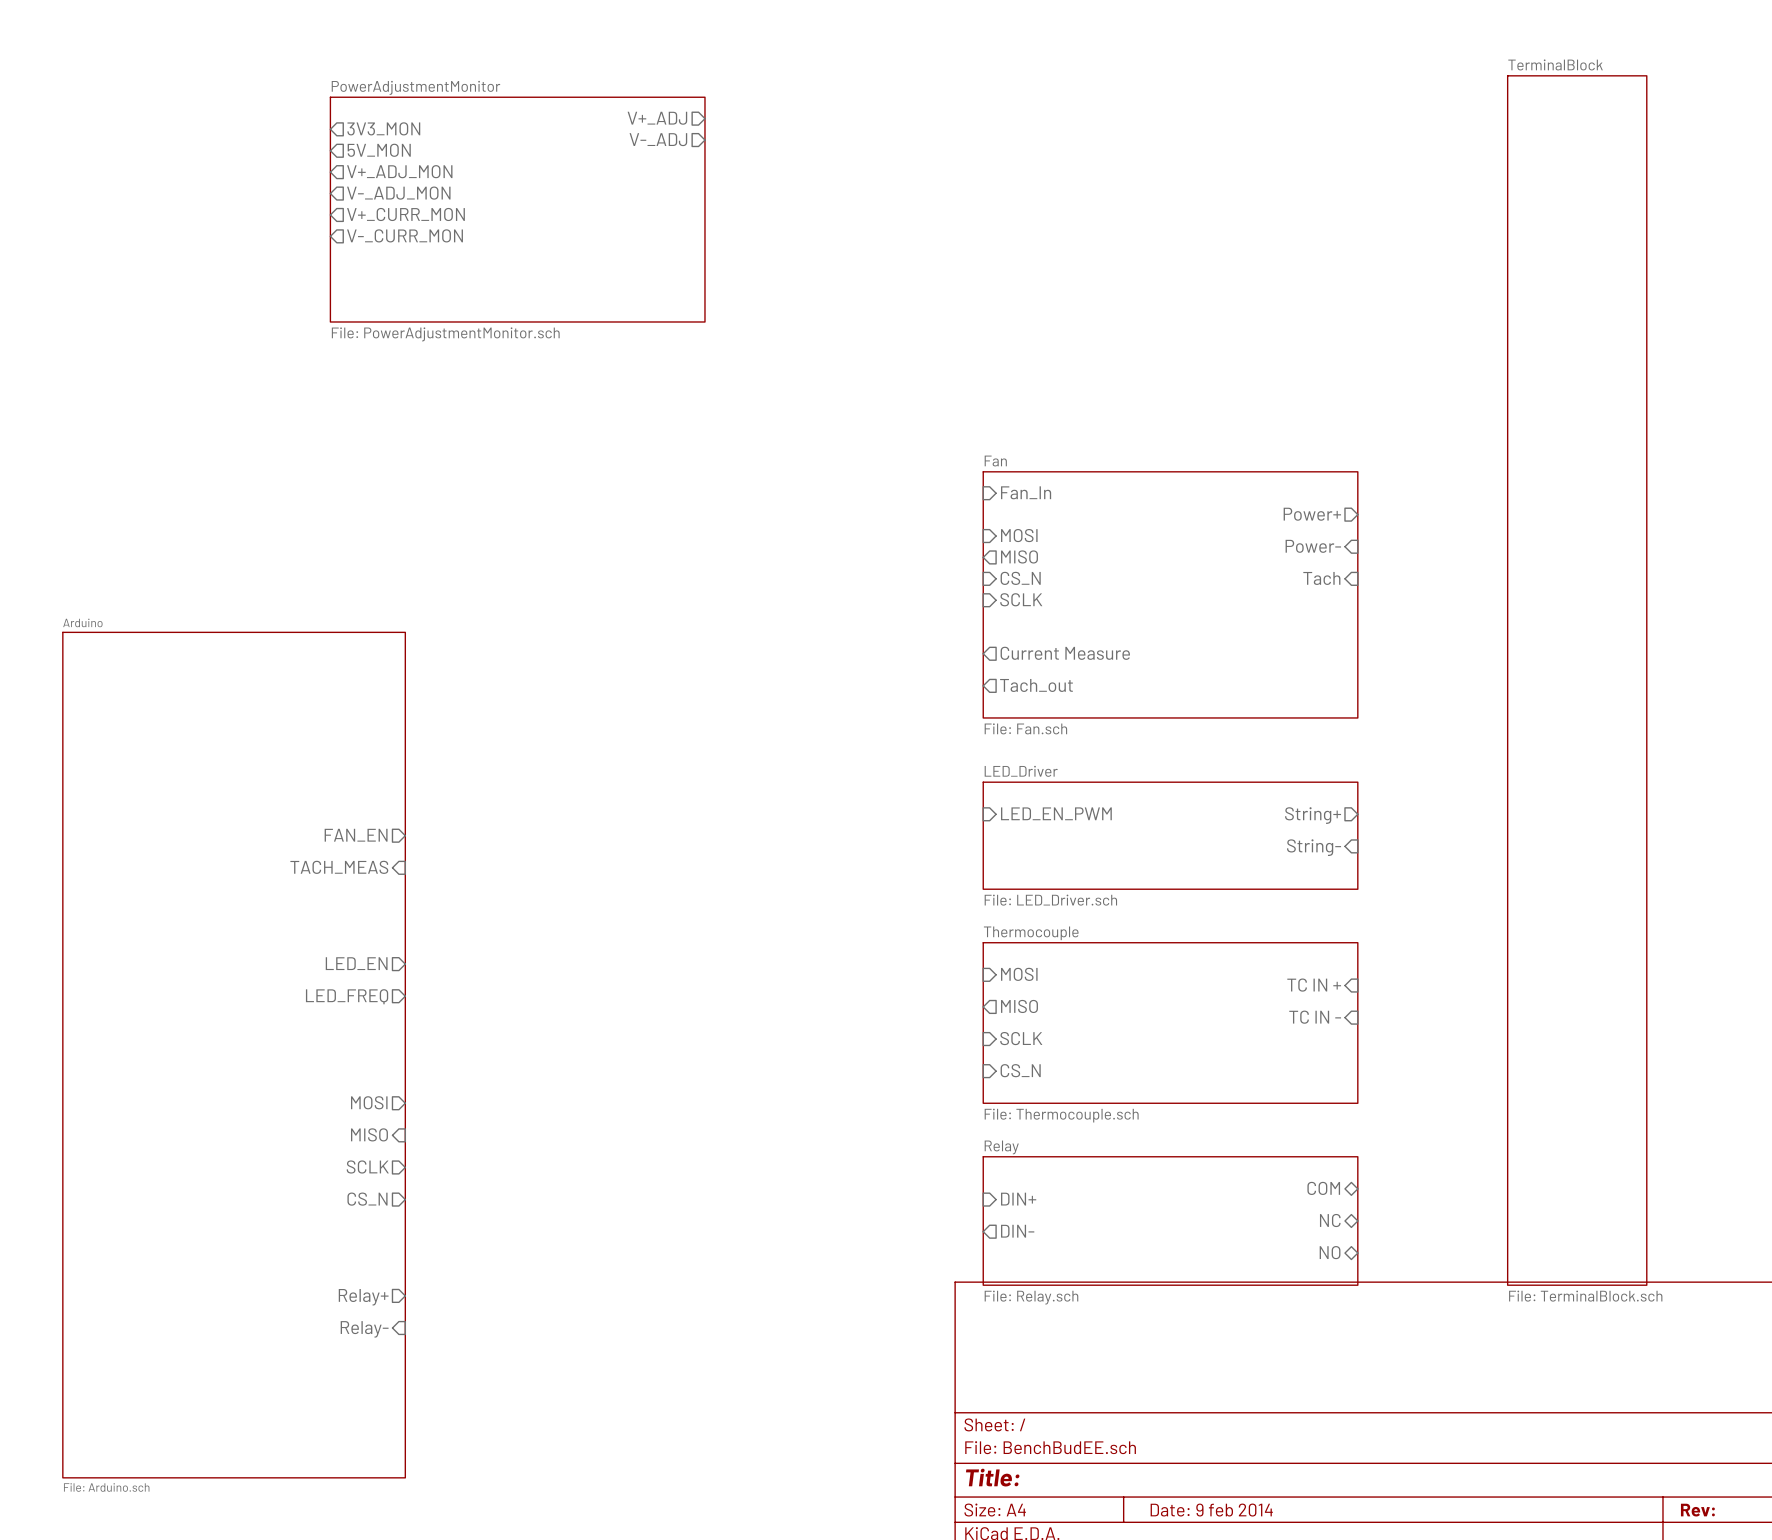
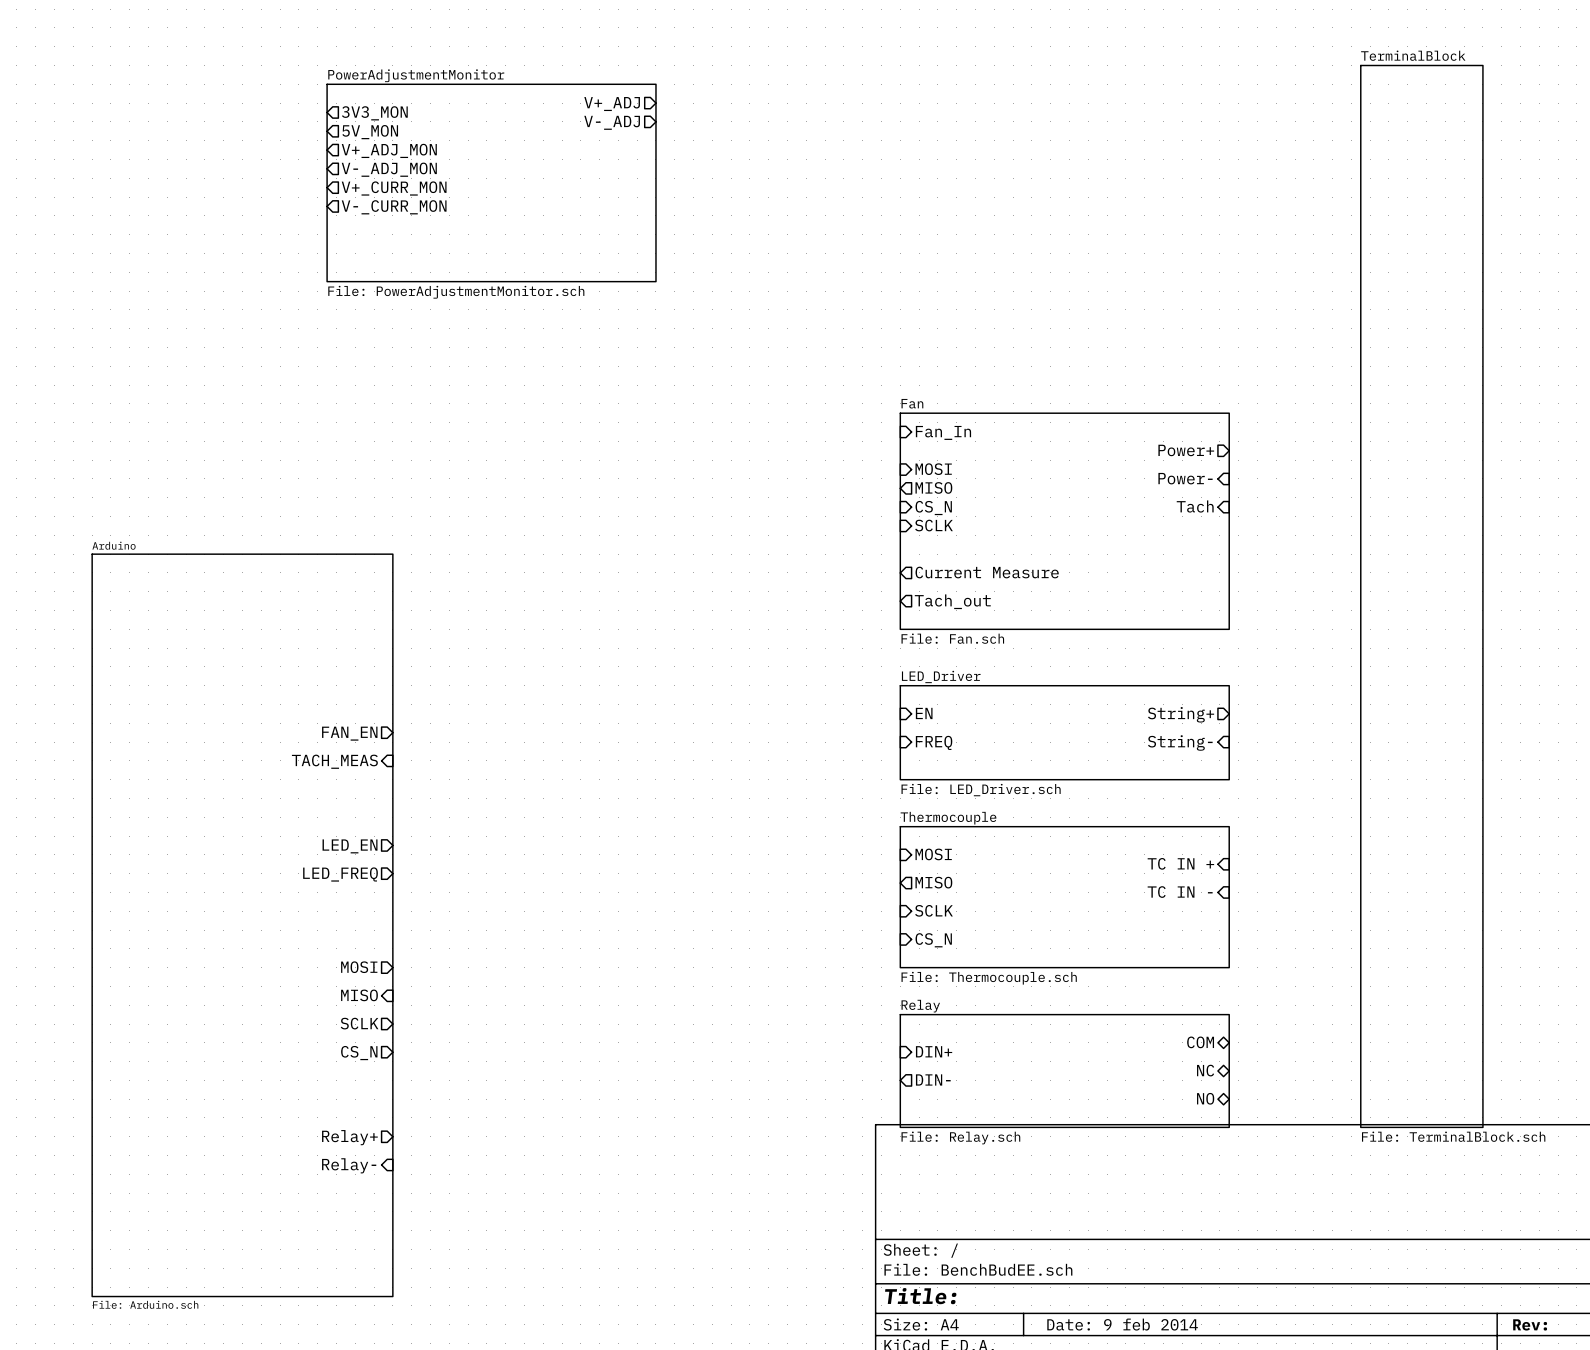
sheet pin: LED_EN_PWM (1056, 813) -> EN (924, 713)
sheet pin: none -> FREQ (934, 742)

